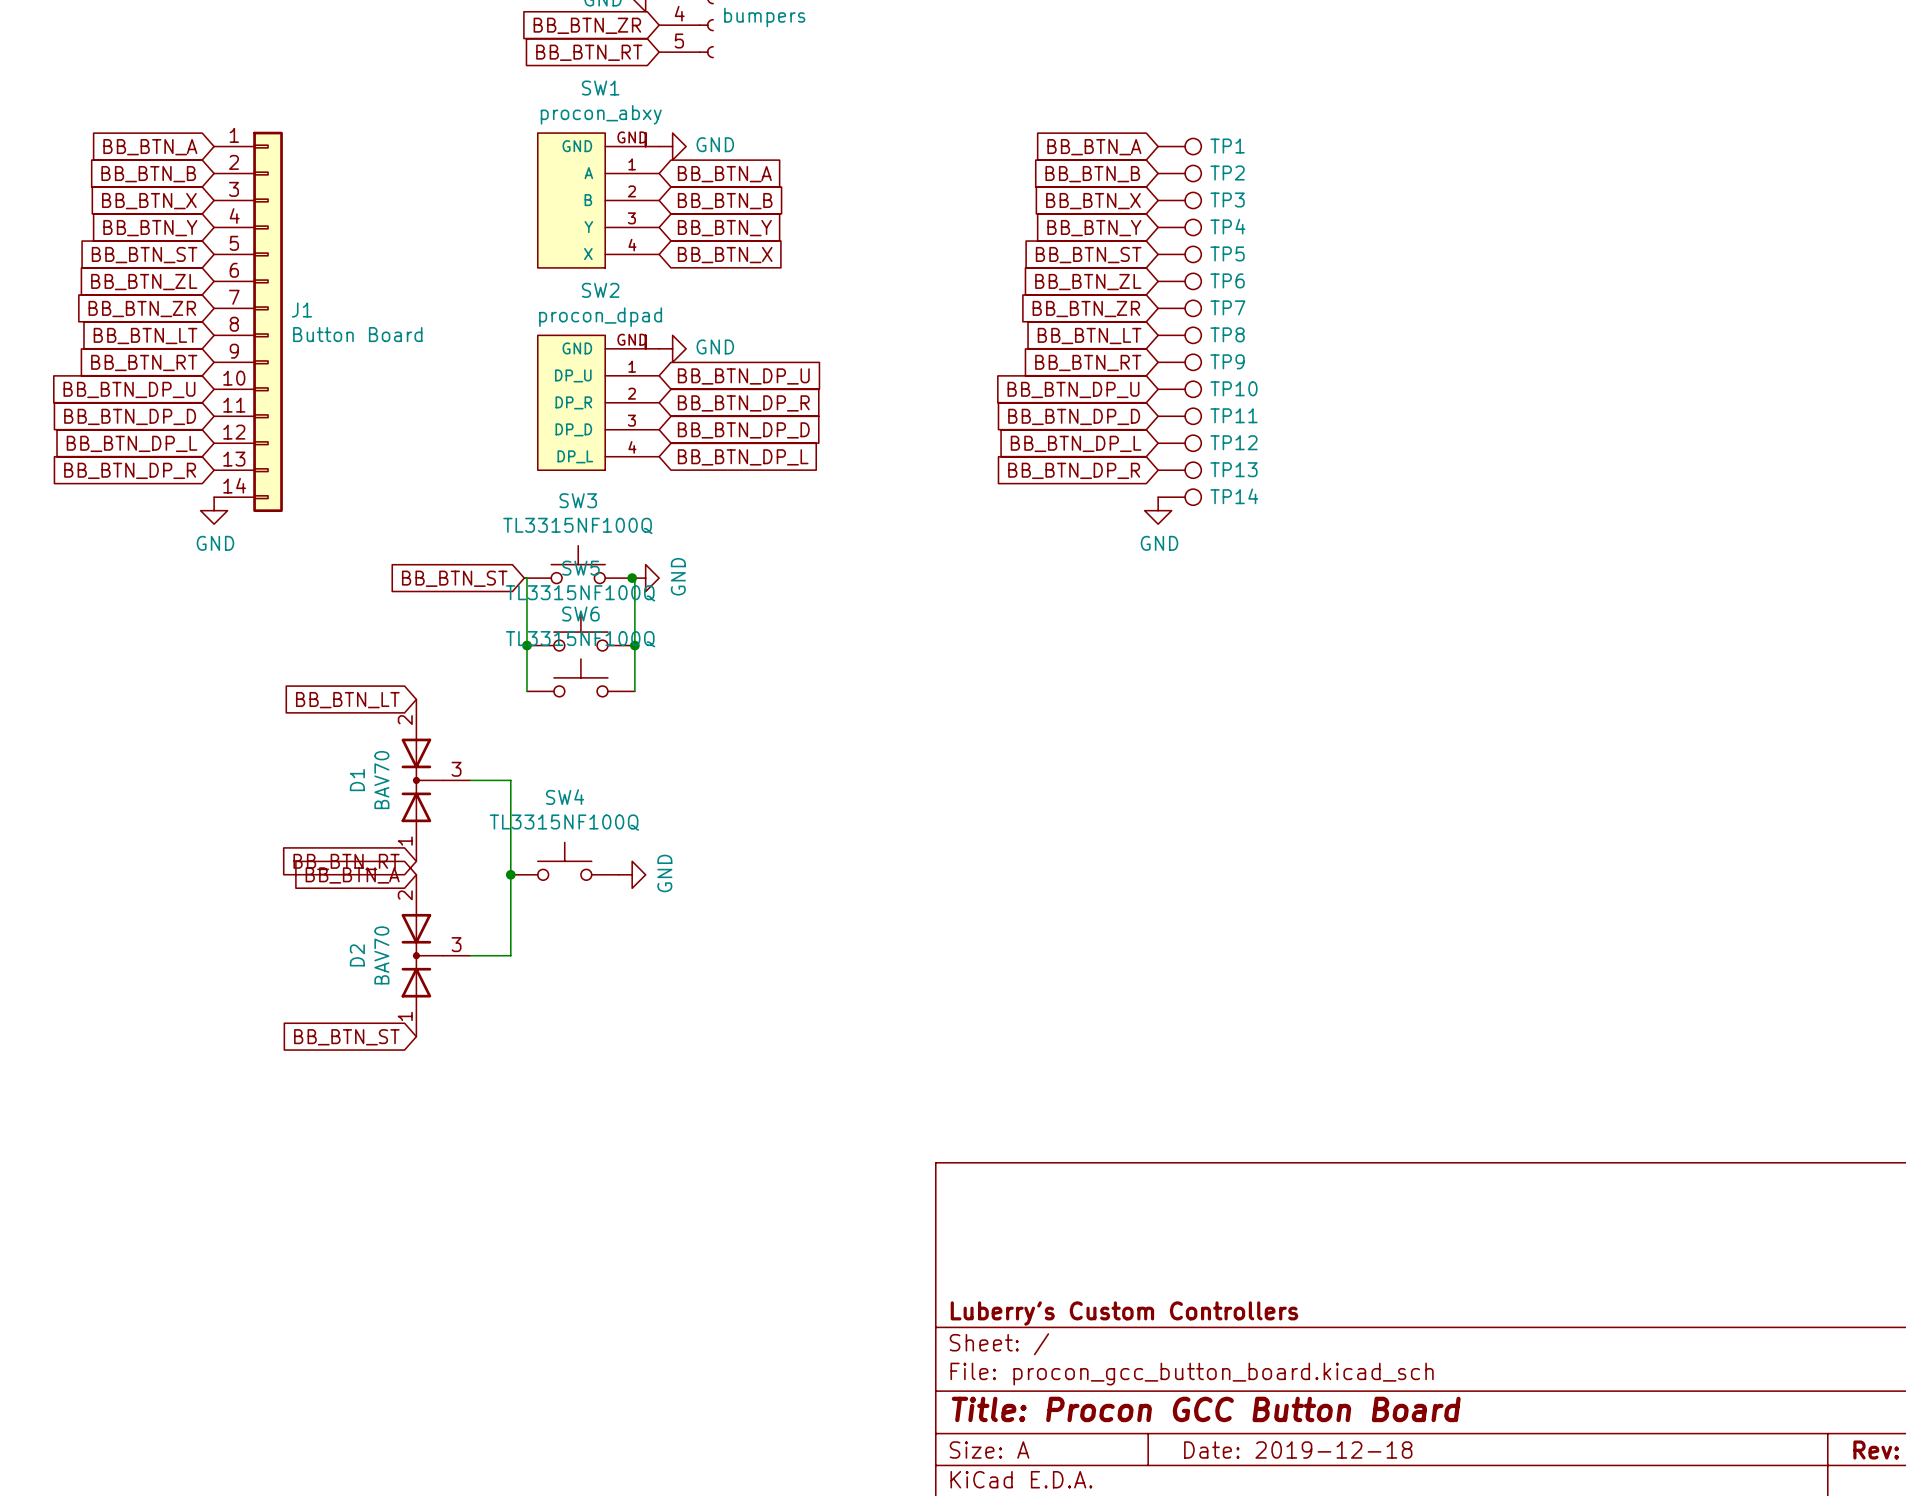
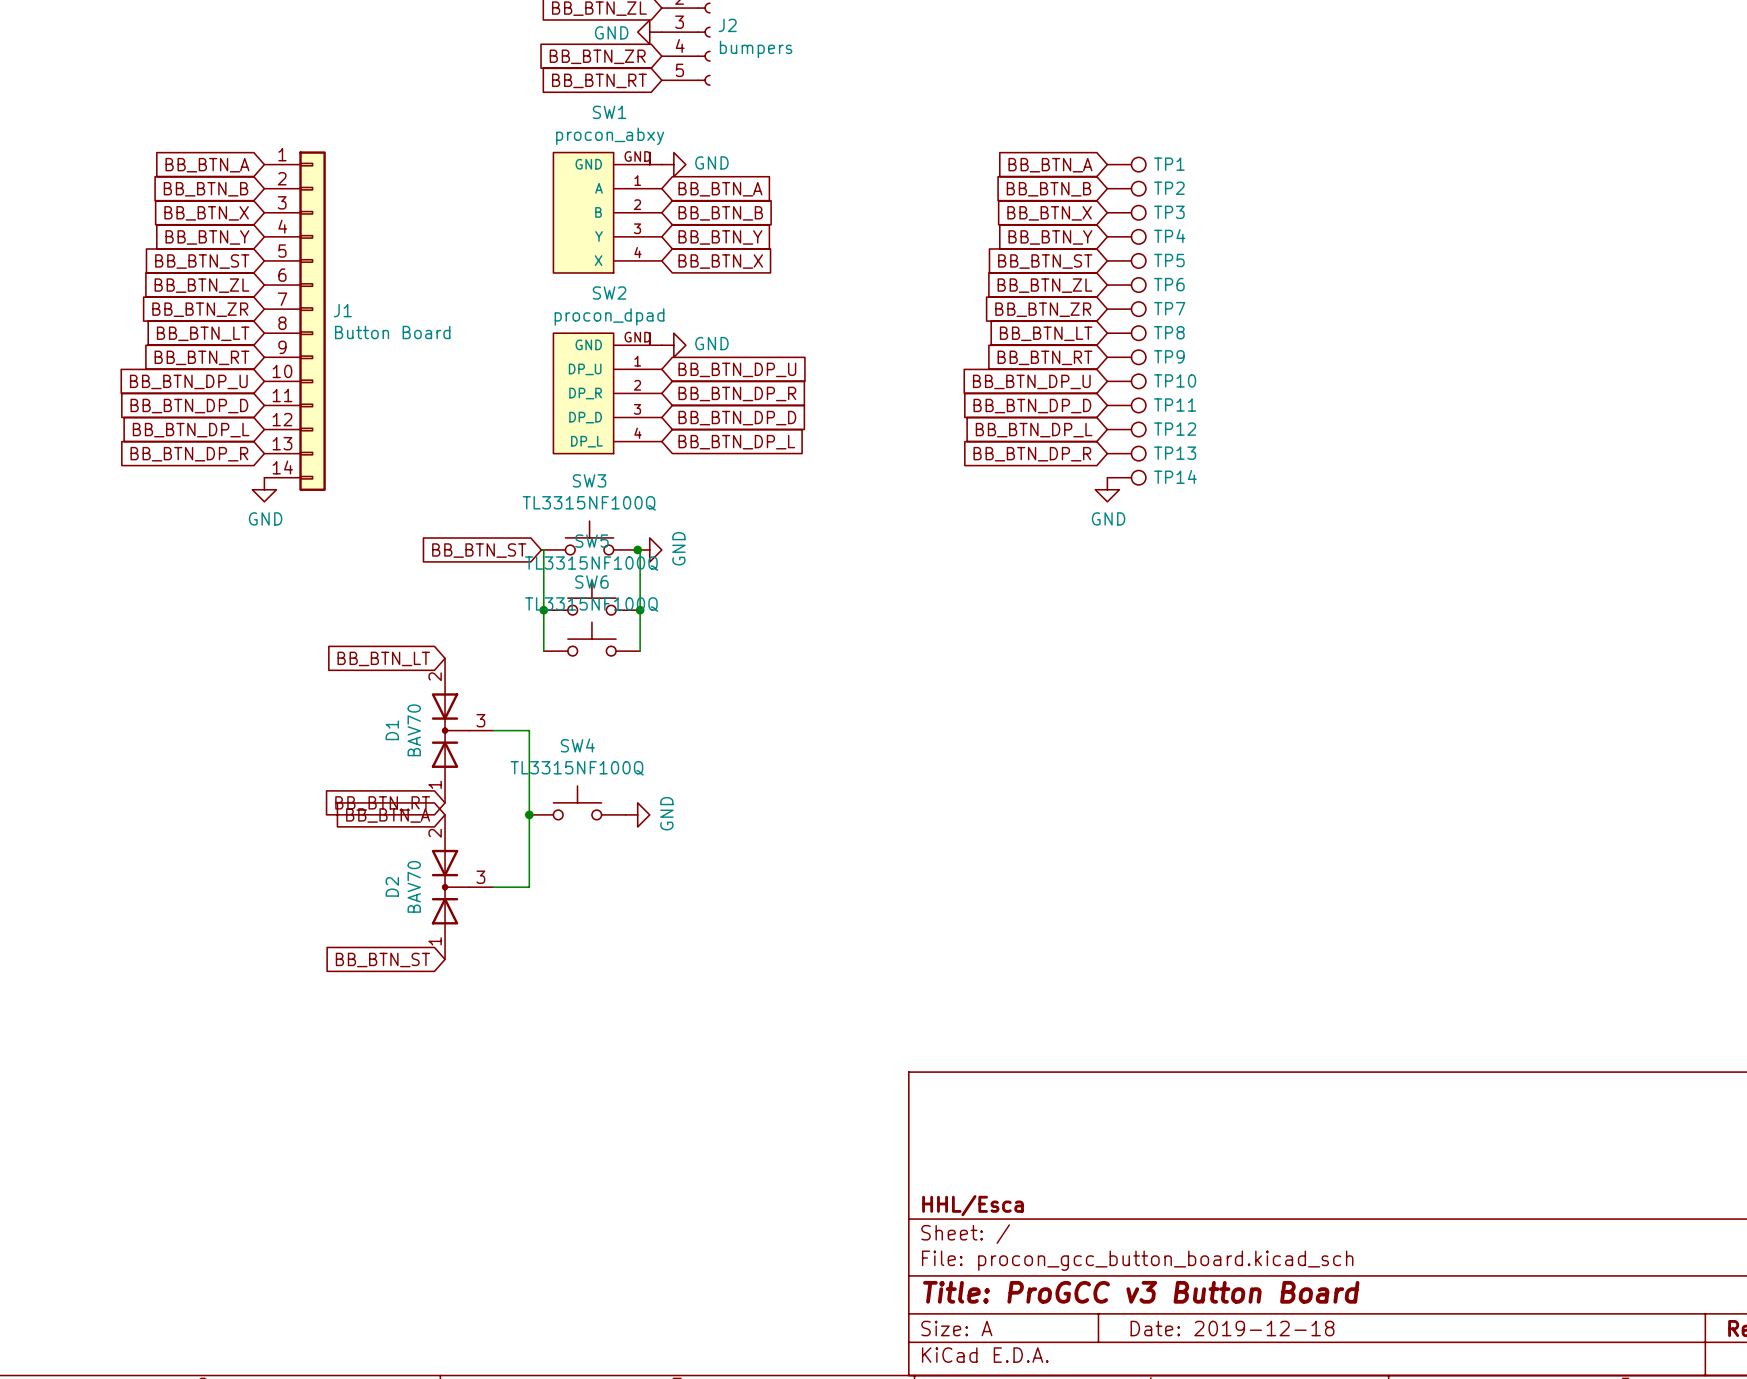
title block: Luberry's Custom Controllers (1124, 1313) -> HHL/Esca (973, 1205)
title block: Title: Procon GCC Button Board (1206, 1409) -> Title: ProGCC v3 Button Board (1141, 1292)

